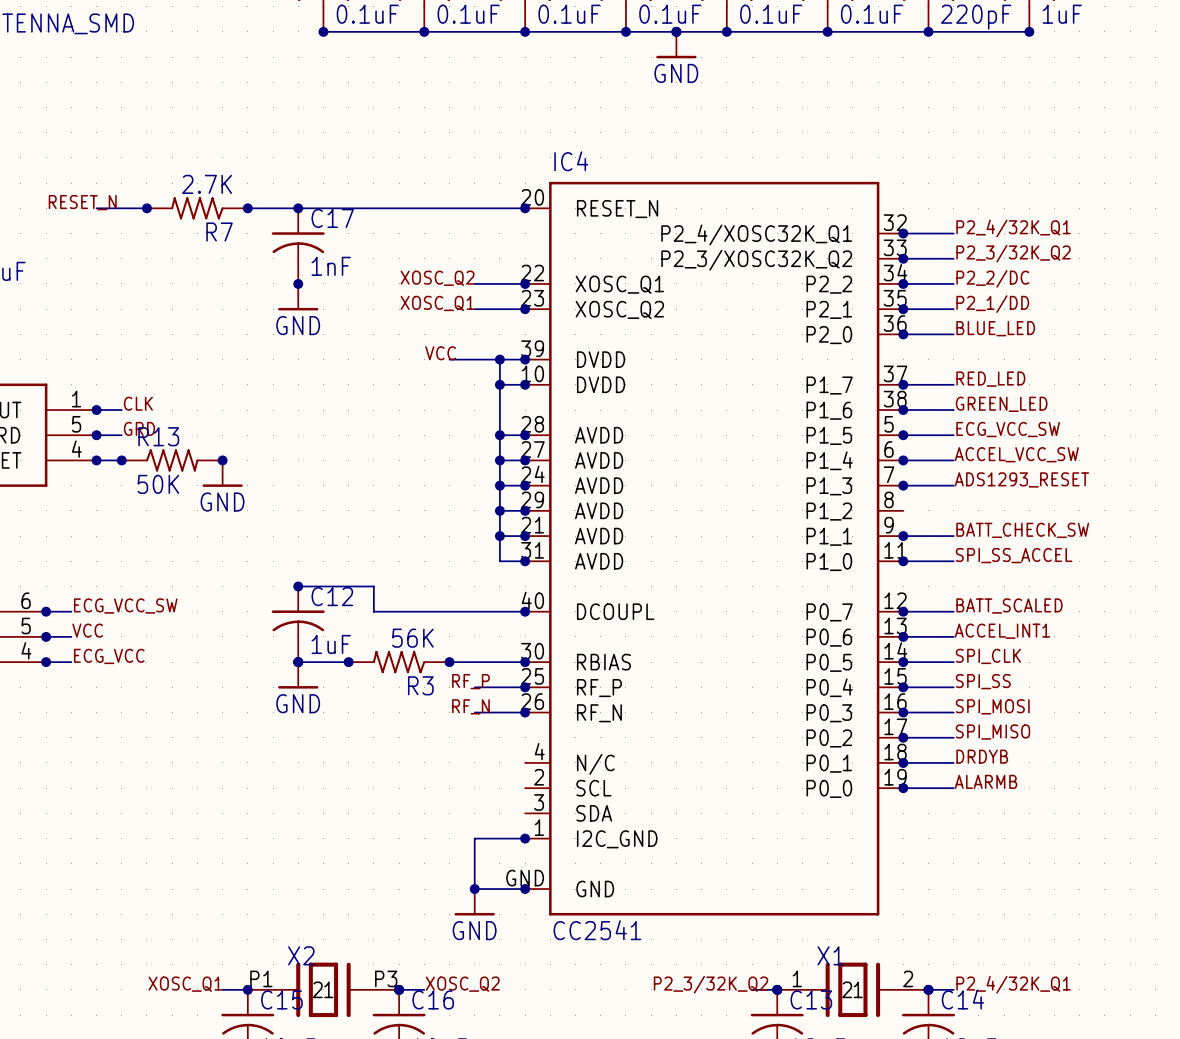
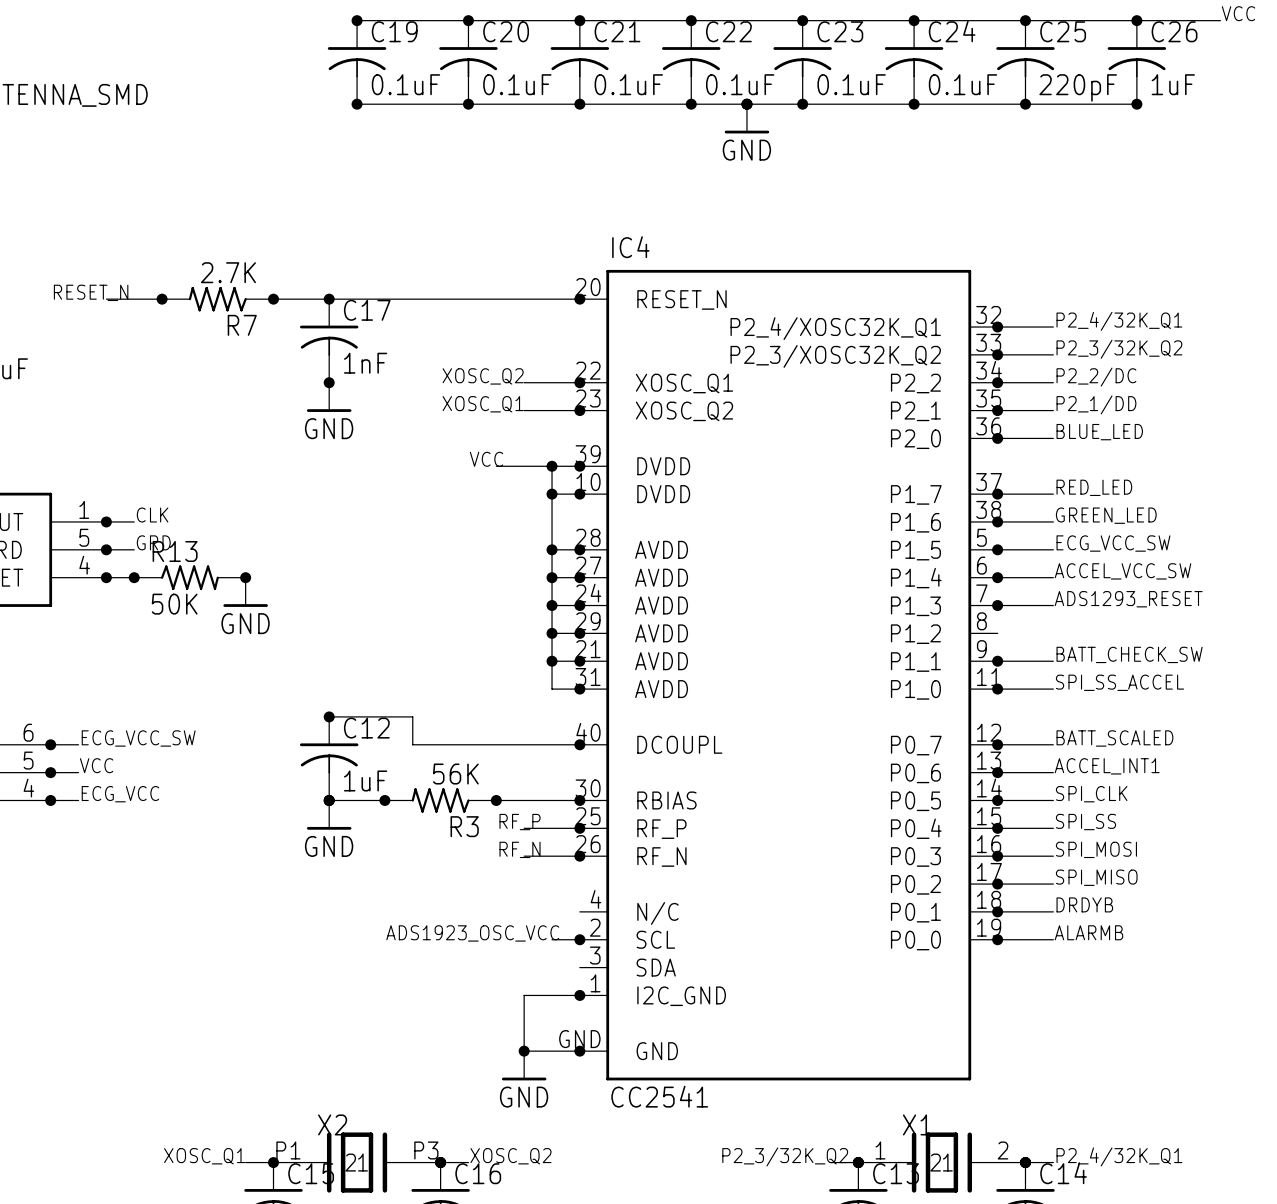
label: none -> ADS1923_OSC_VCC (472, 933)
wire: none -> (552, 939) (579, 939)
junction: none -> (579, 939)

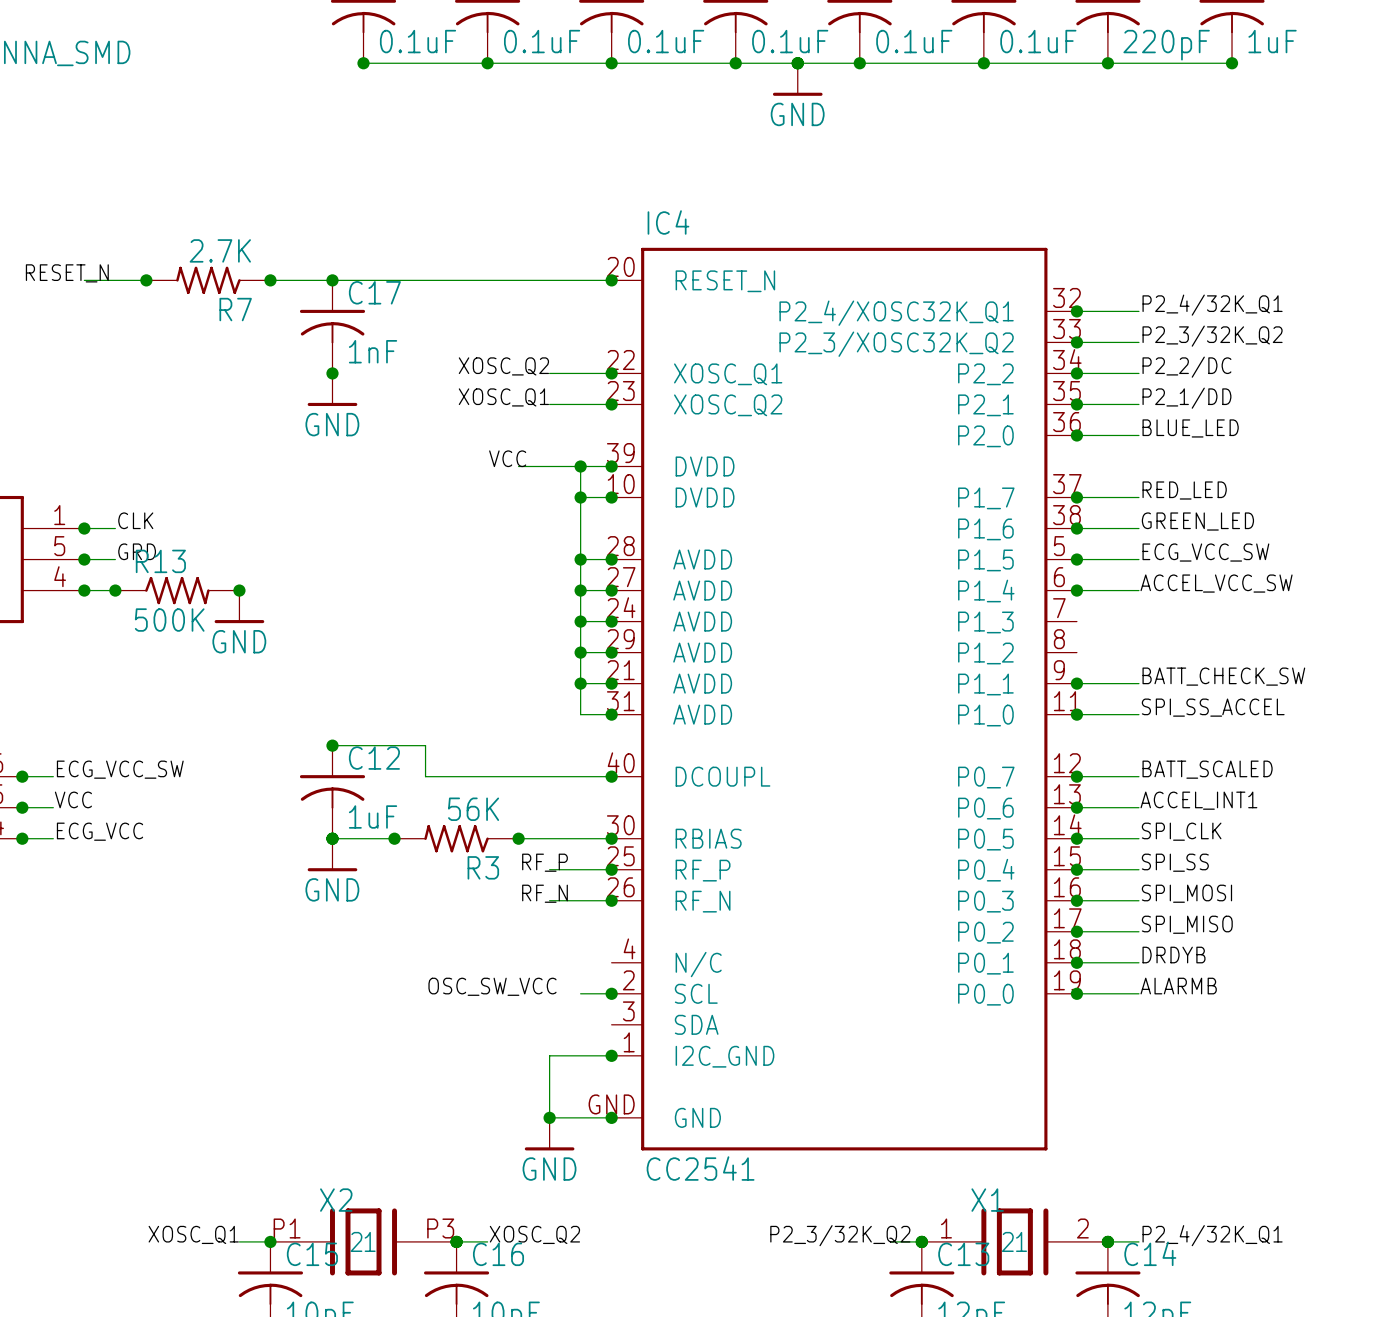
label: ADS1293_RESET (1128, 599) -> none
R13 value: 50K (174, 604) -> 500K (169, 620)
wire: (997, 605) (1053, 605) -> none
junction: (997, 605) -> none
label: ADS1923_OSC_VCC (472, 933) -> none
label: none -> OSC_SW_VCC (492, 986)

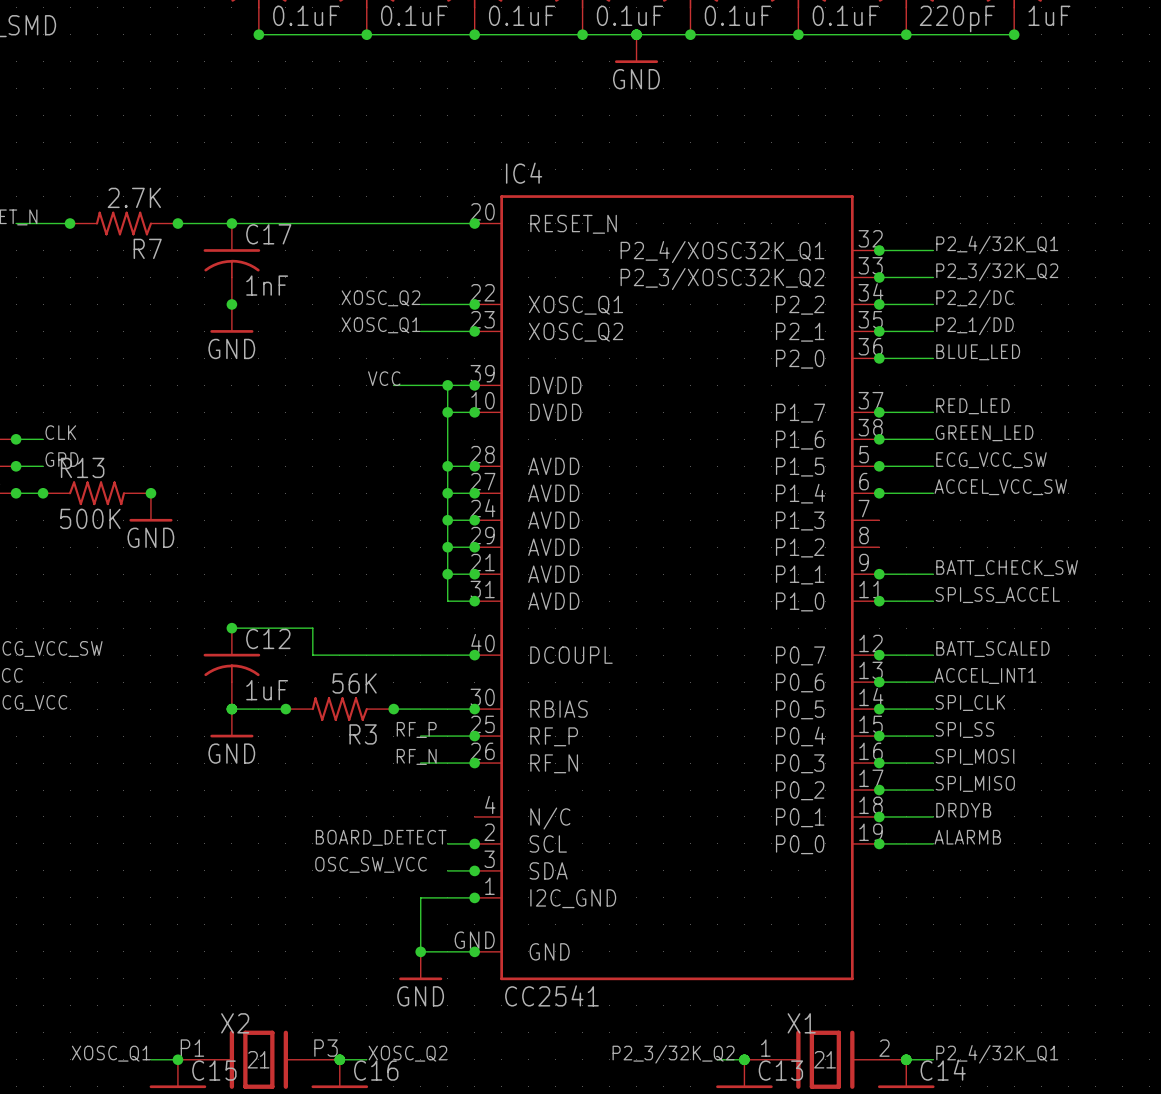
label: OSC_SW_VCC (492, 986) -> BOARD_DETECT (381, 837)
label: none -> OSC_SW_VCC (371, 864)
wire: none -> (447, 870) (474, 870)
junction: none -> (474, 870)

